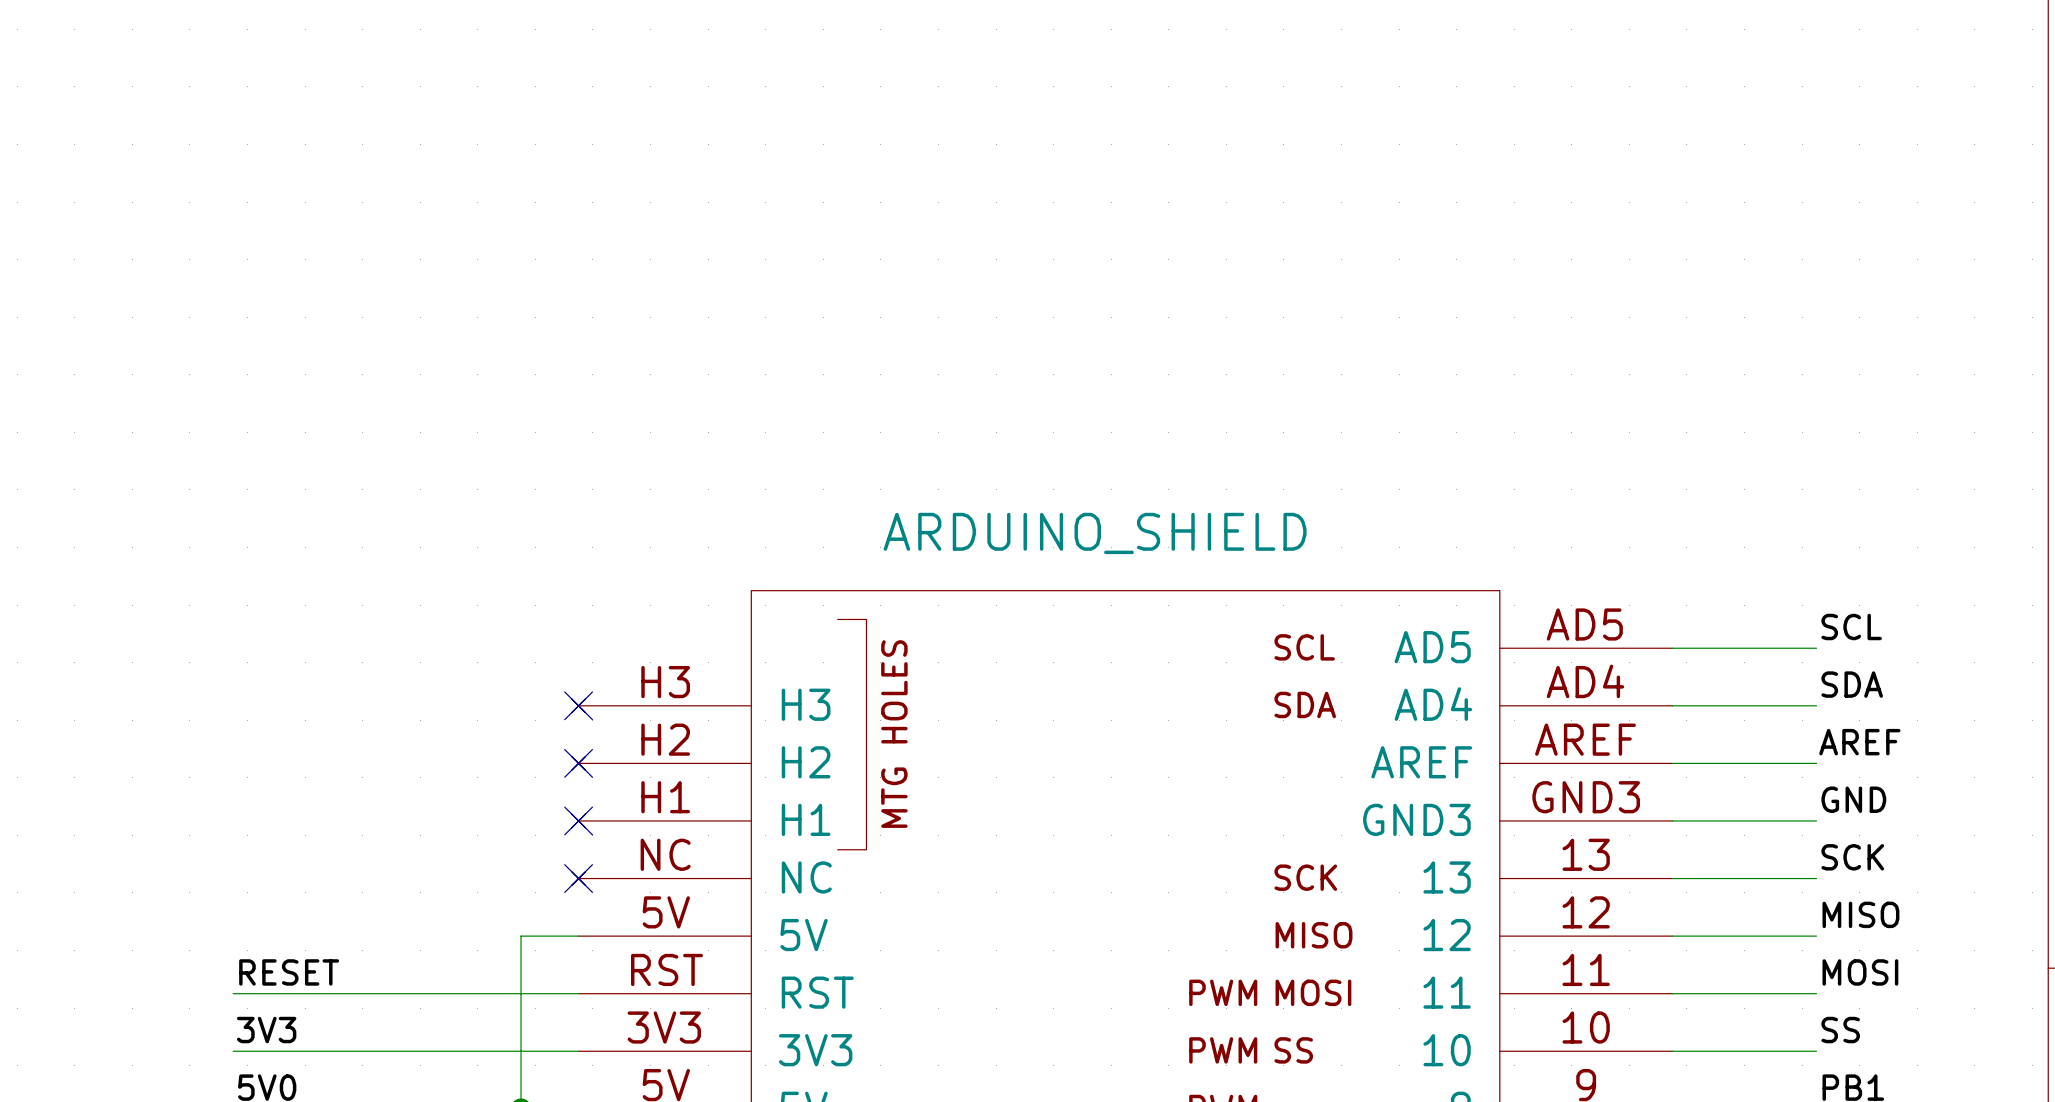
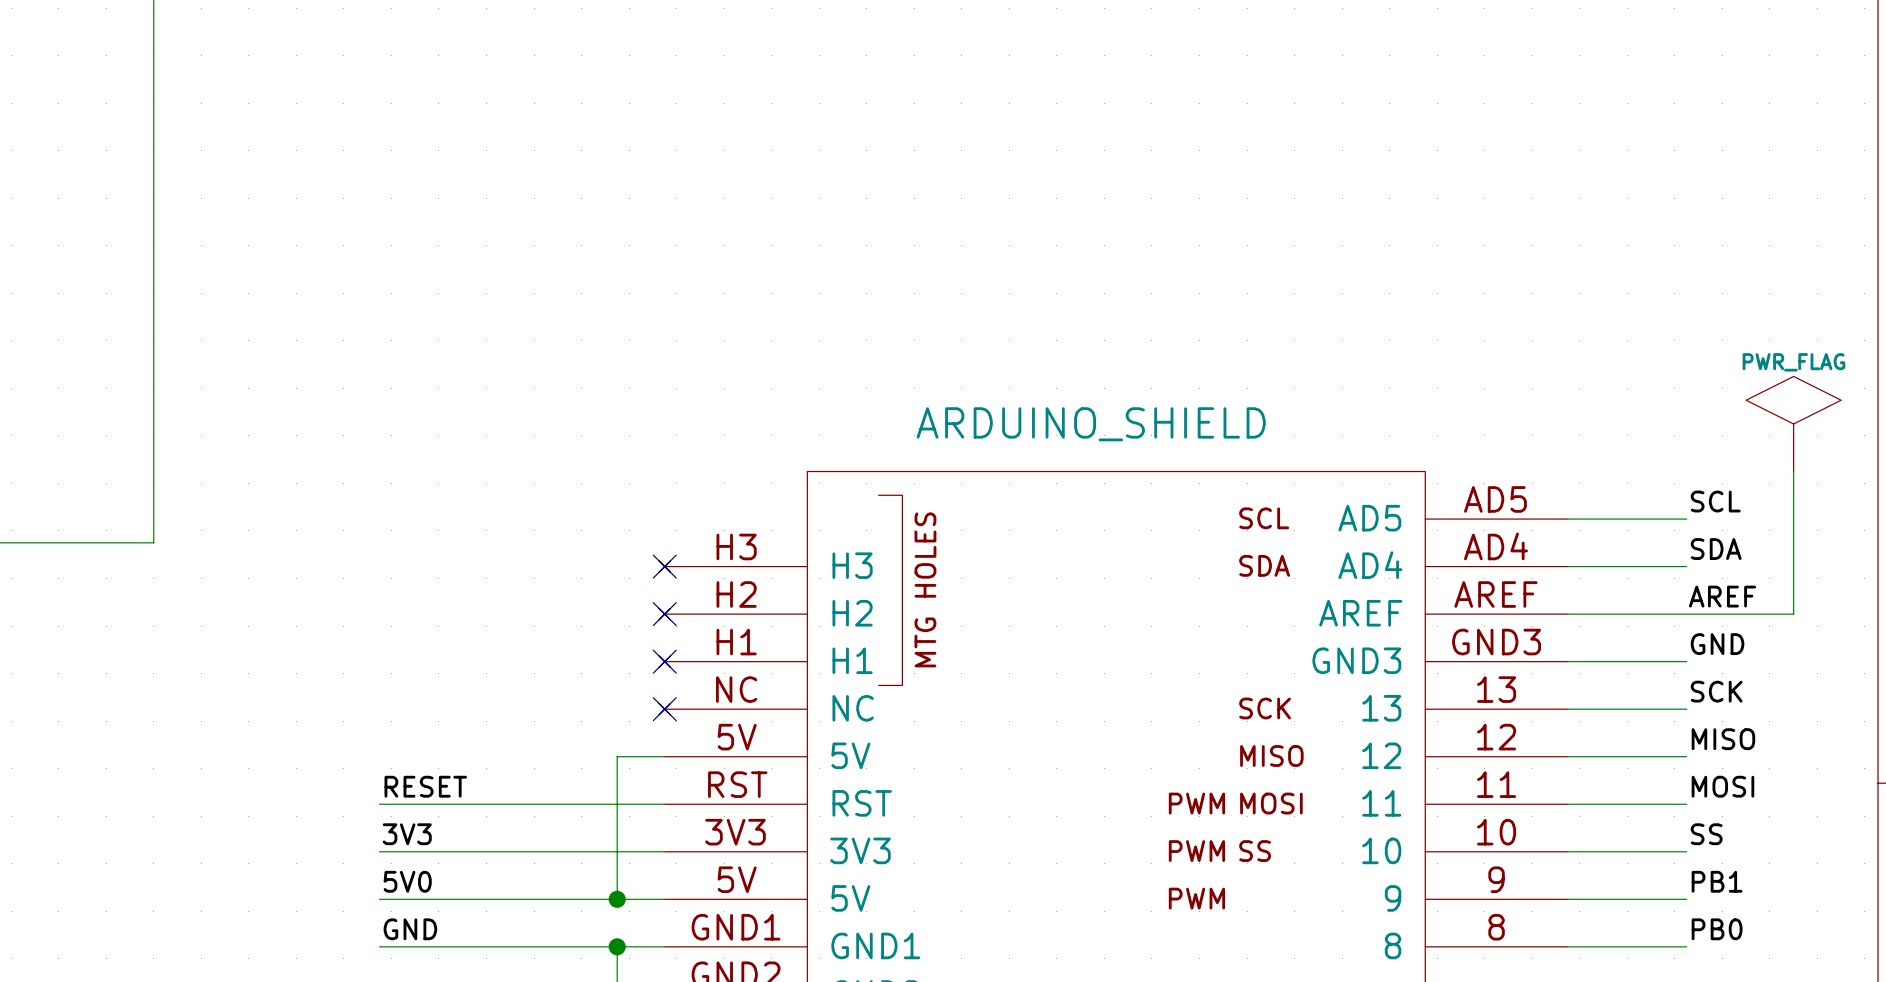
power symbol: none -> PWR_FLAG (1793, 423)
wire: none -> (1793, 471) (1793, 614) (1686, 614)

